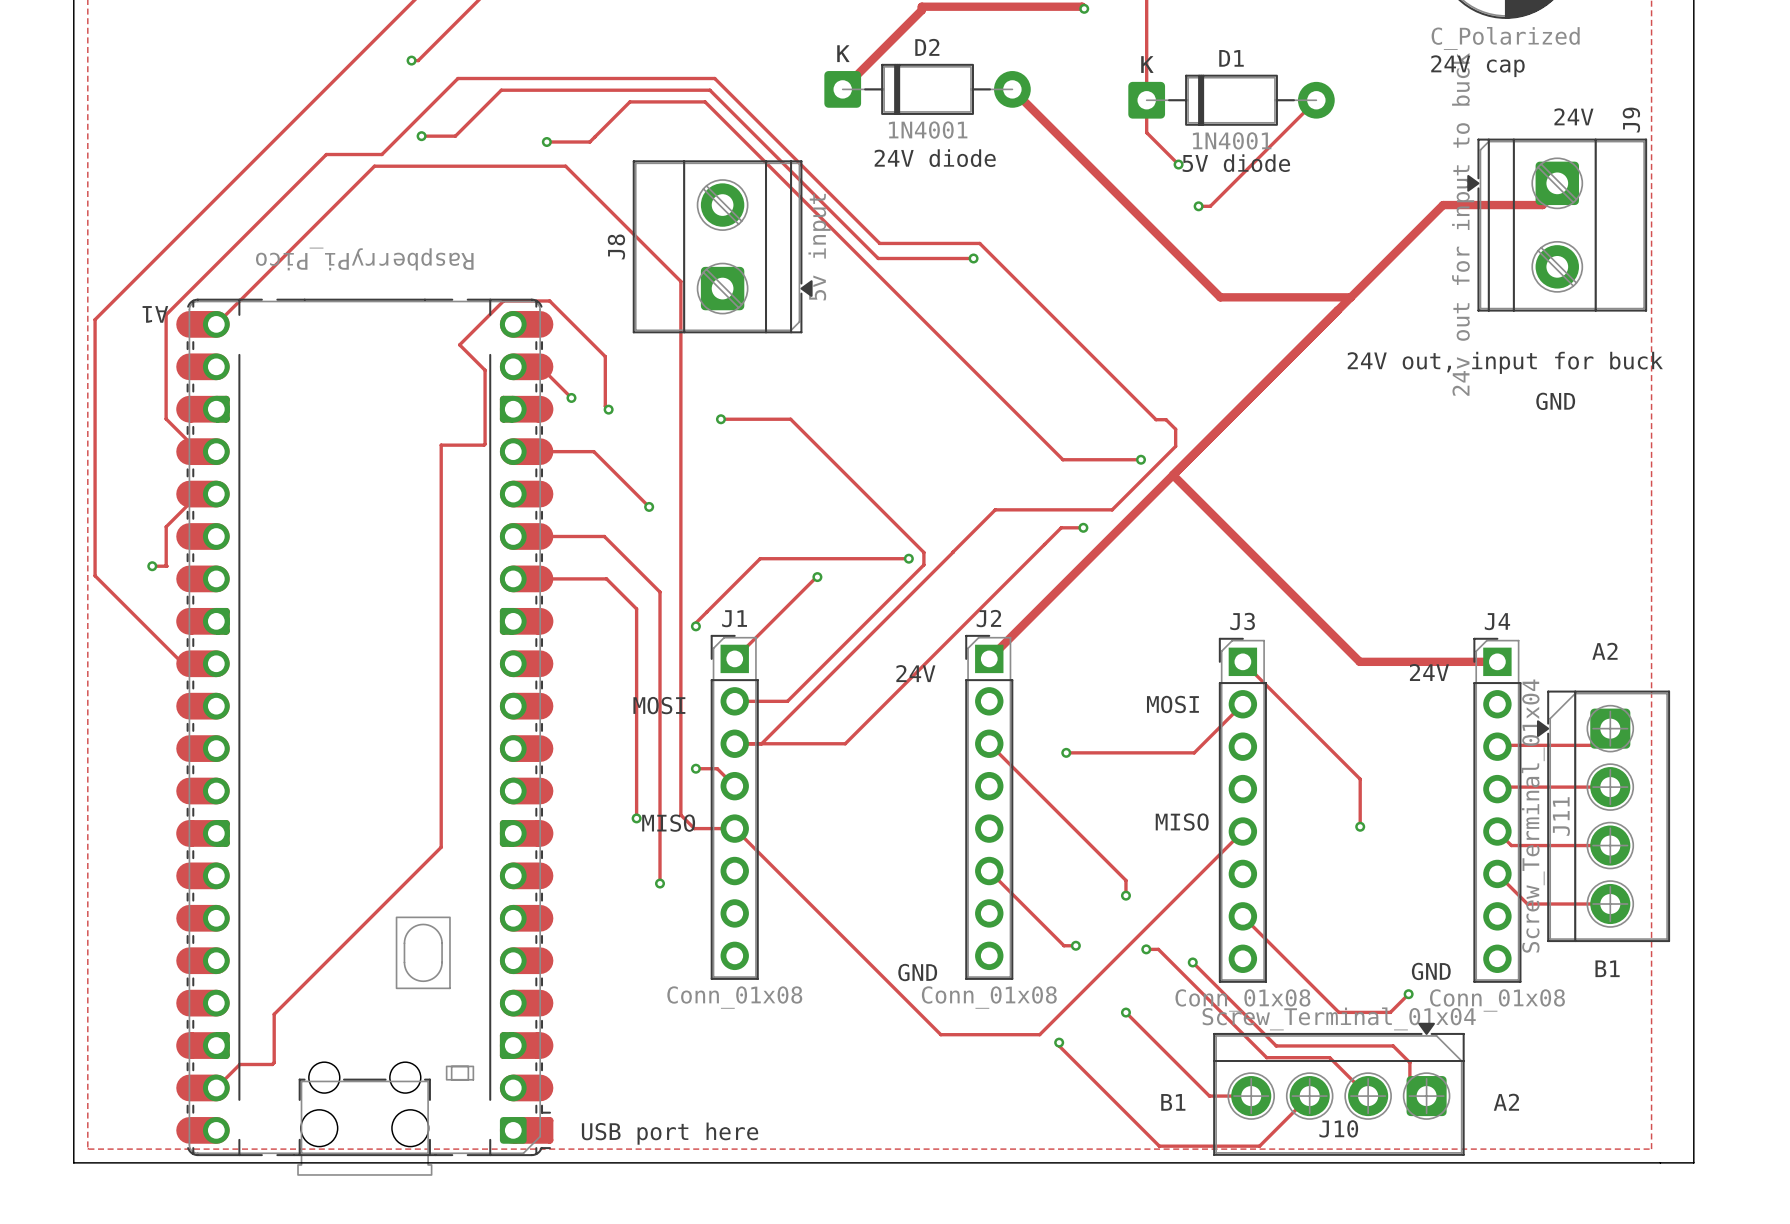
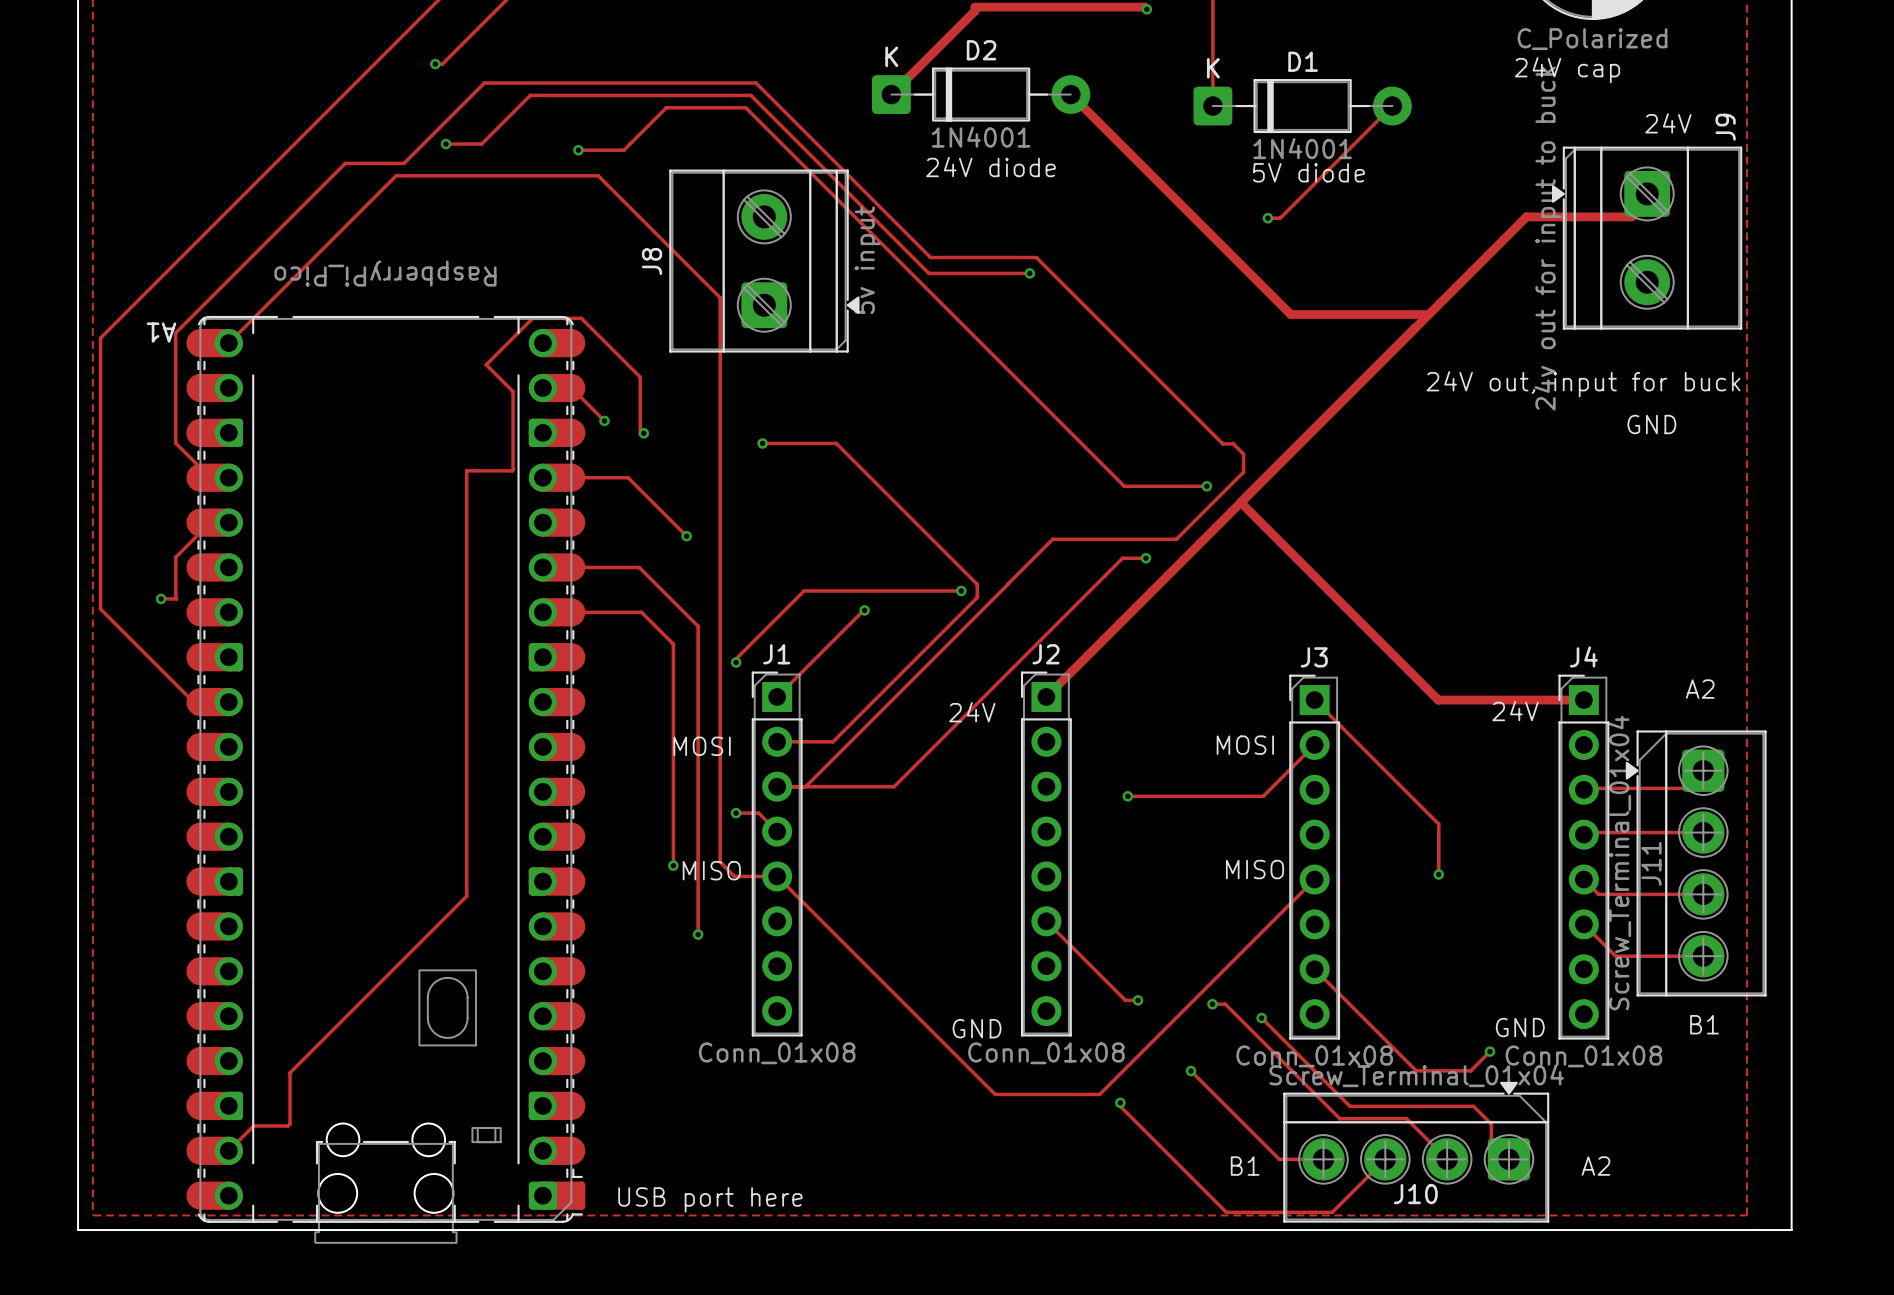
track: (1146, 100) (1146, 132) (1178, 164) -> none
via: (1178, 164) -> none
track: (989, 743) (1125, 880) (1125, 895) -> none
via: (1125, 895) -> none

